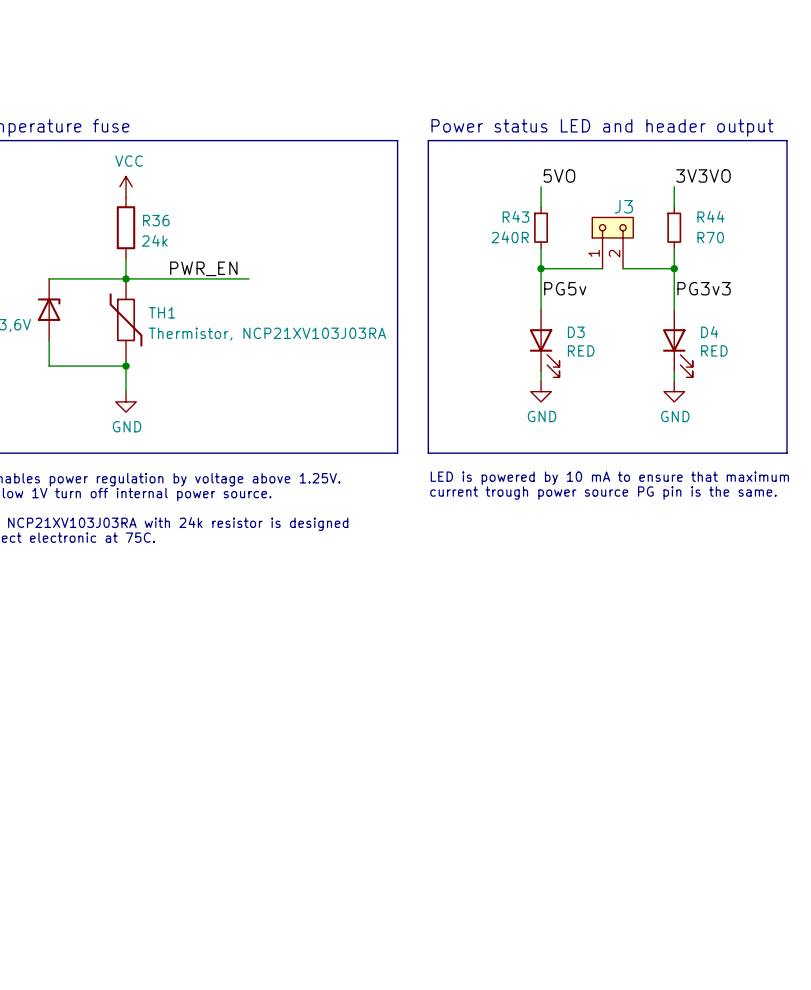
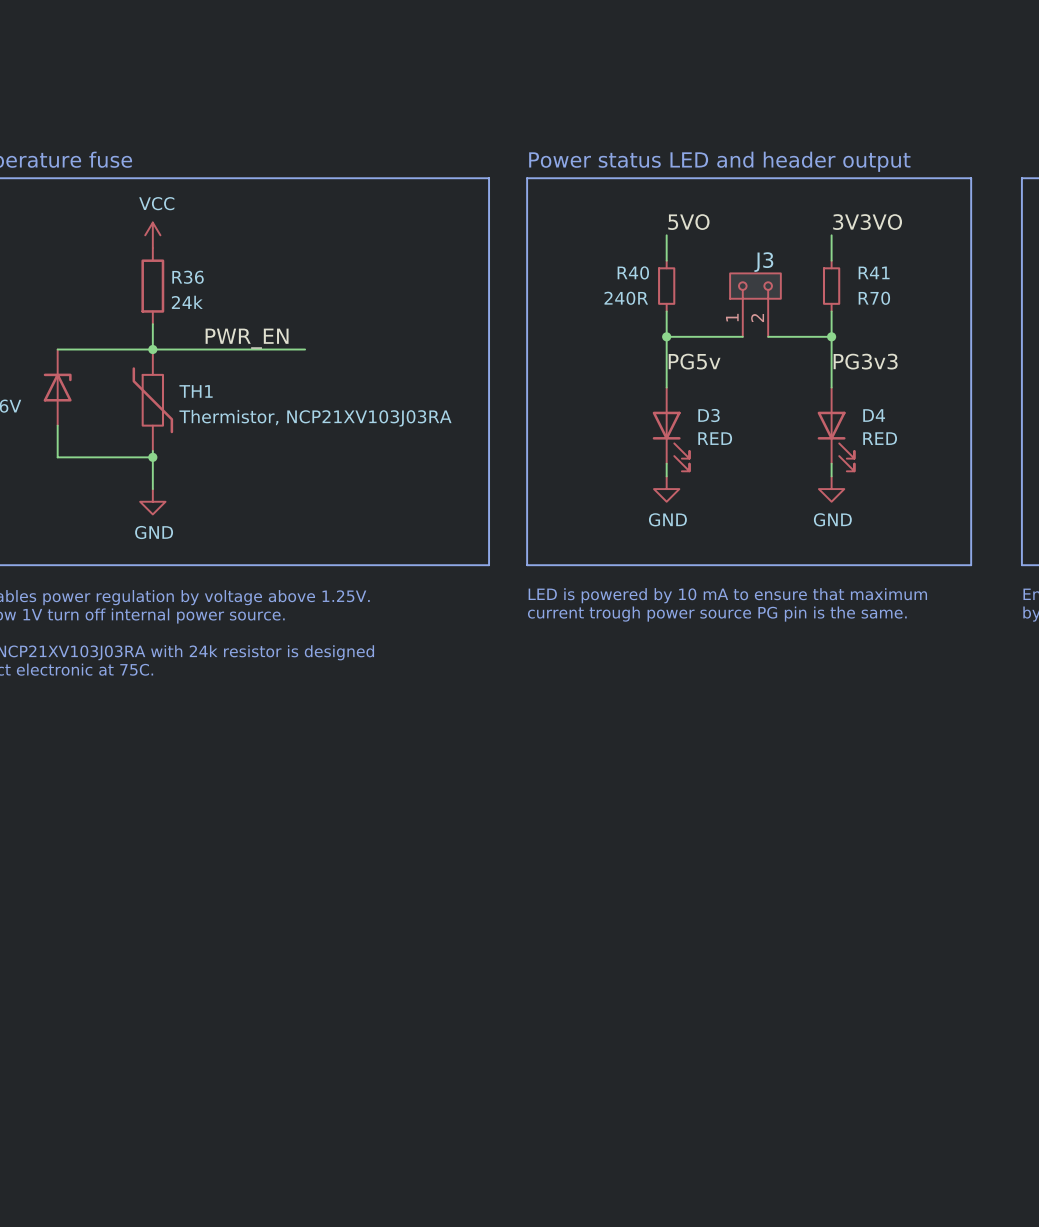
R43 name: R43 (515, 216) -> R40 (633, 272)
R44 name: R44 (710, 216) -> R41 (874, 272)

